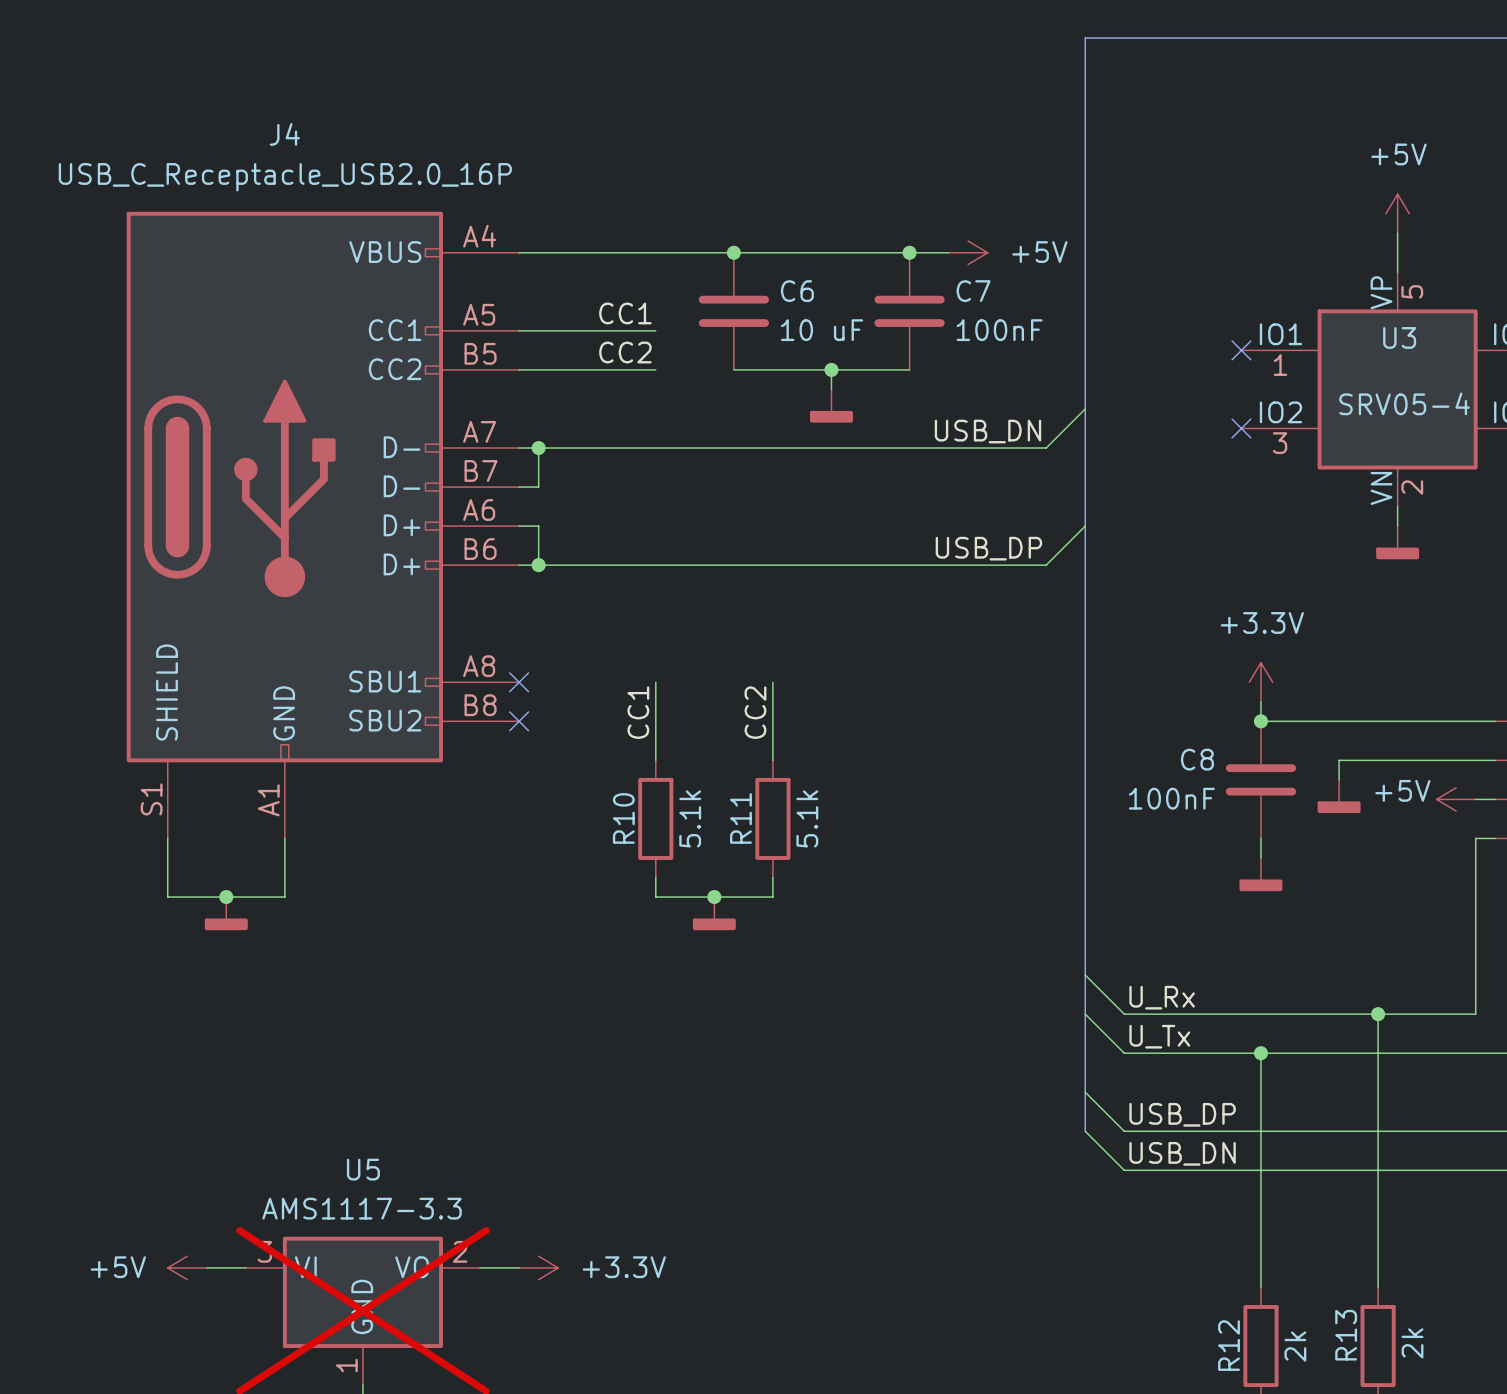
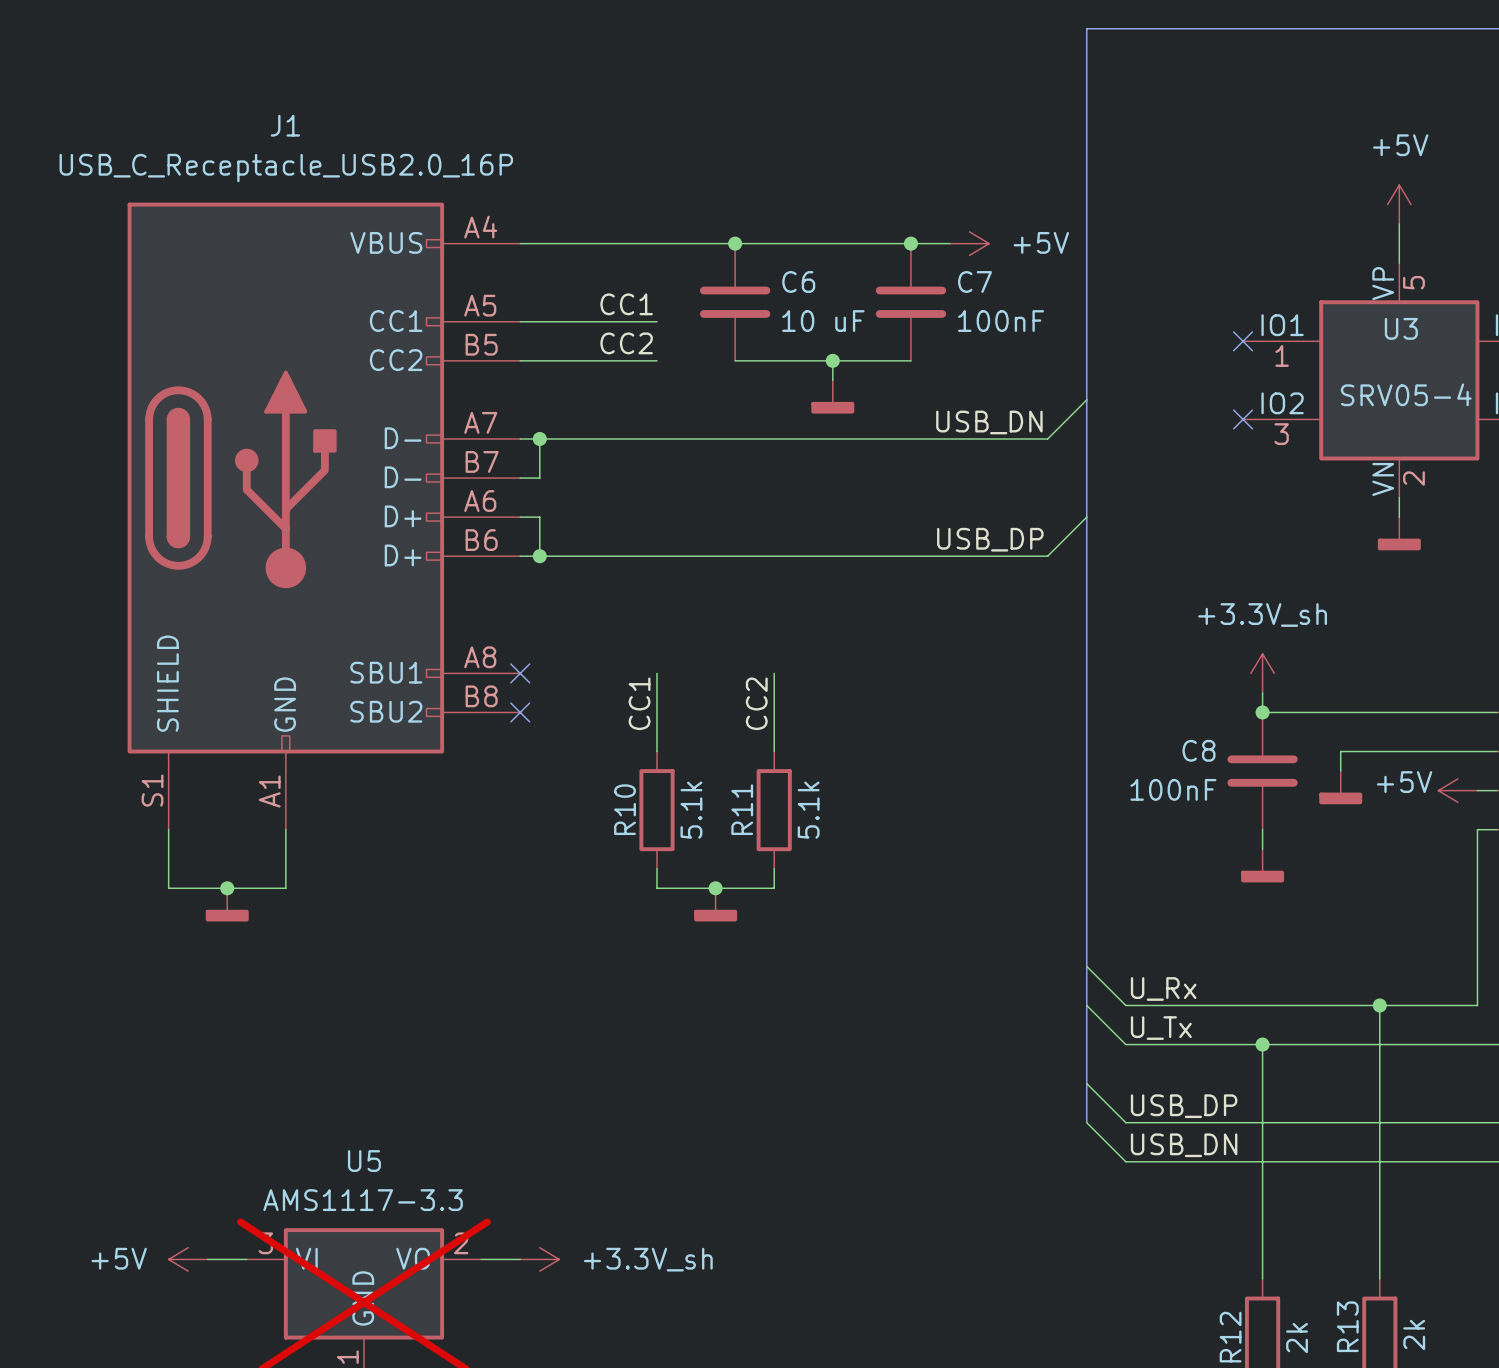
J4 name: J4 (284, 134) -> J1 (285, 125)
power symbol: +3.3V (1260, 682) -> +3.3V_sh (1262, 673)
power symbol: +3.3V (538, 1267) -> +3.3V_sh (539, 1259)

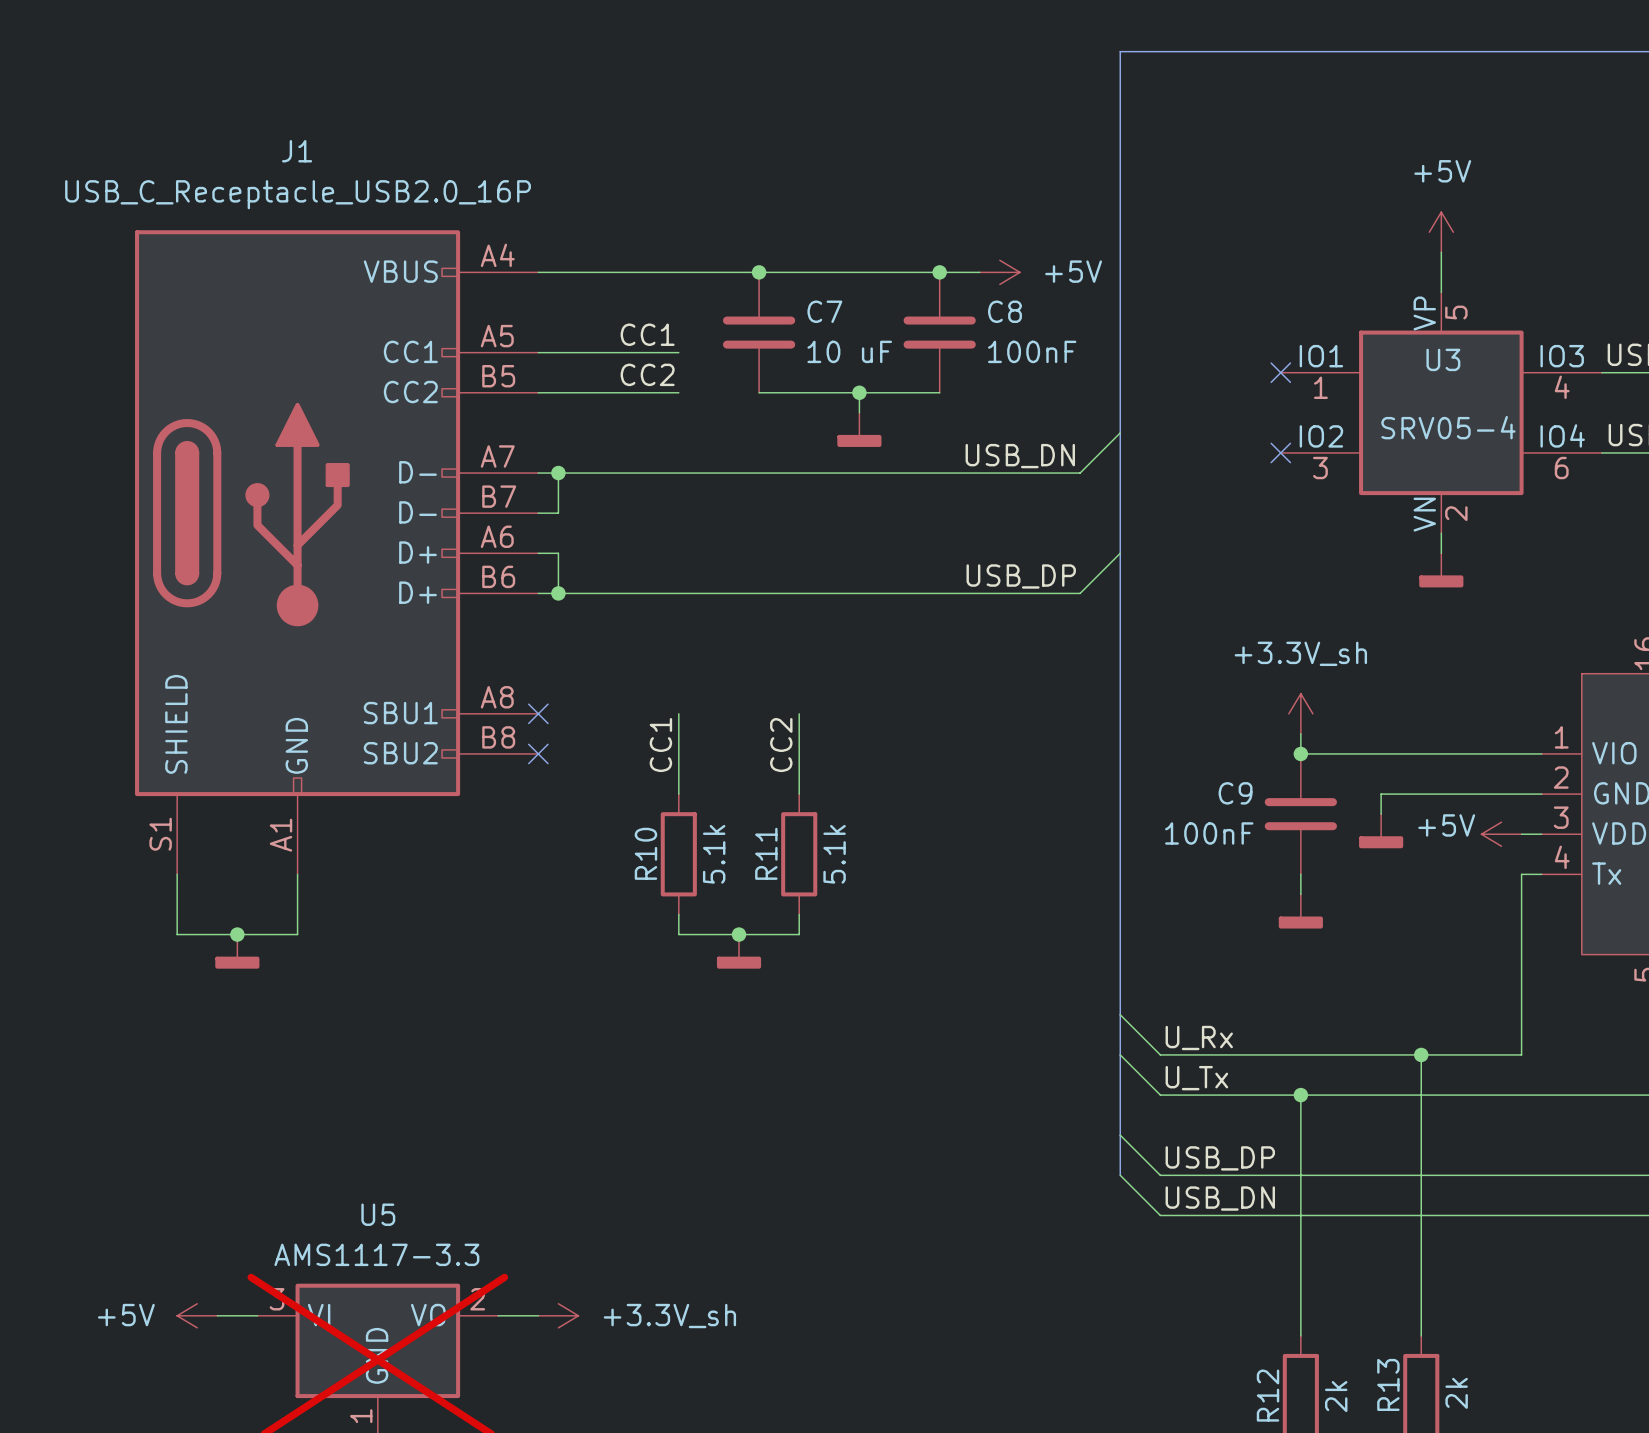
C6 name: C6 (798, 281) -> C7 (824, 311)
C7 name: C7 (975, 281) -> C8 (1004, 311)
C8 name: C8 (1198, 750) -> C9 (1235, 793)

